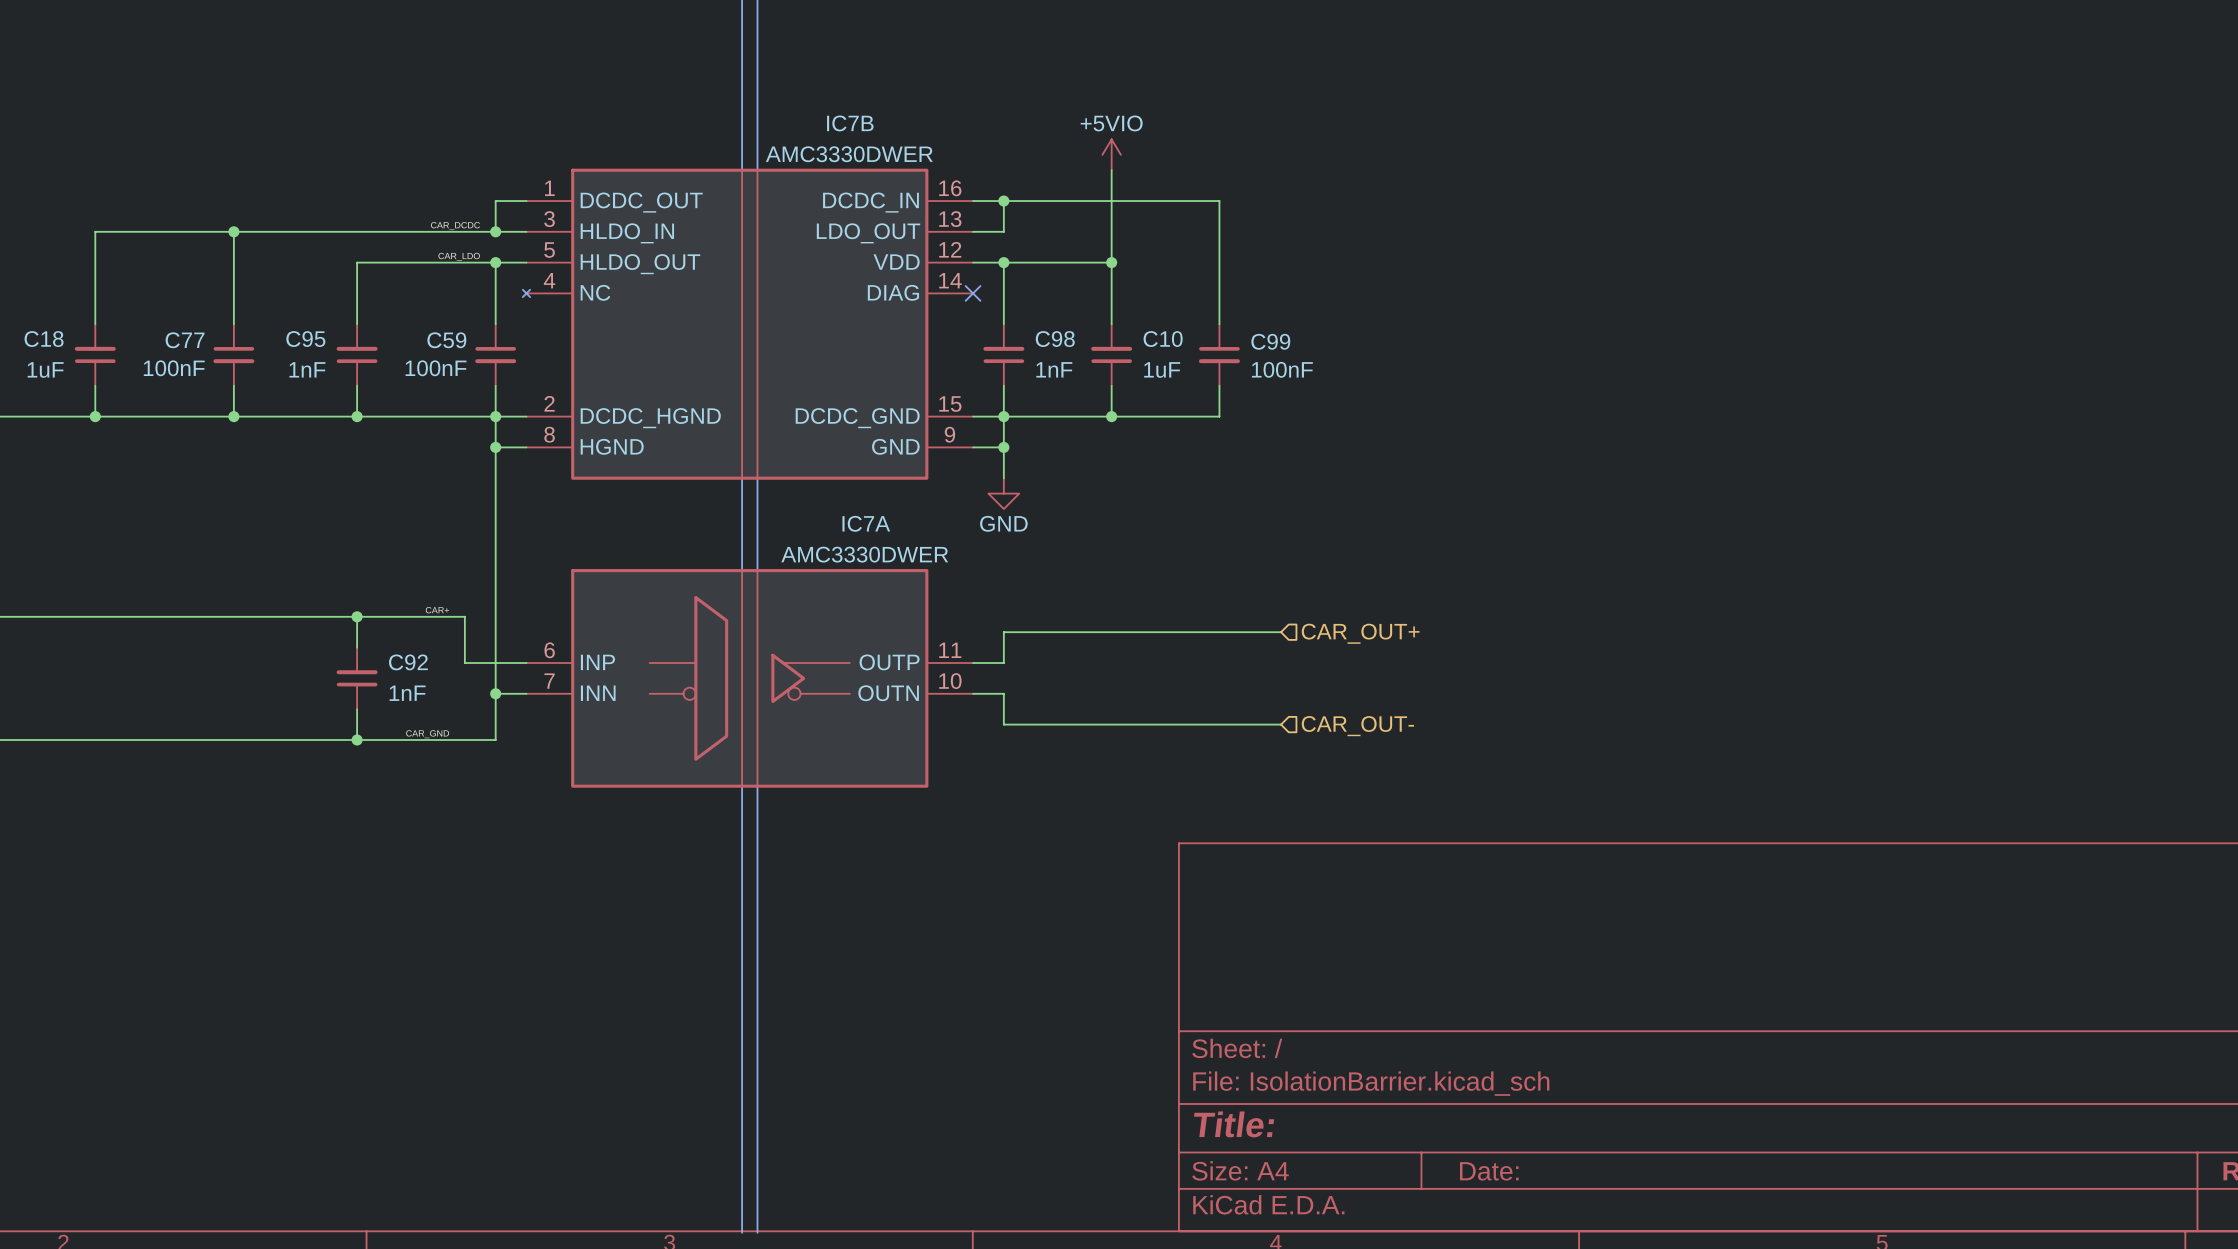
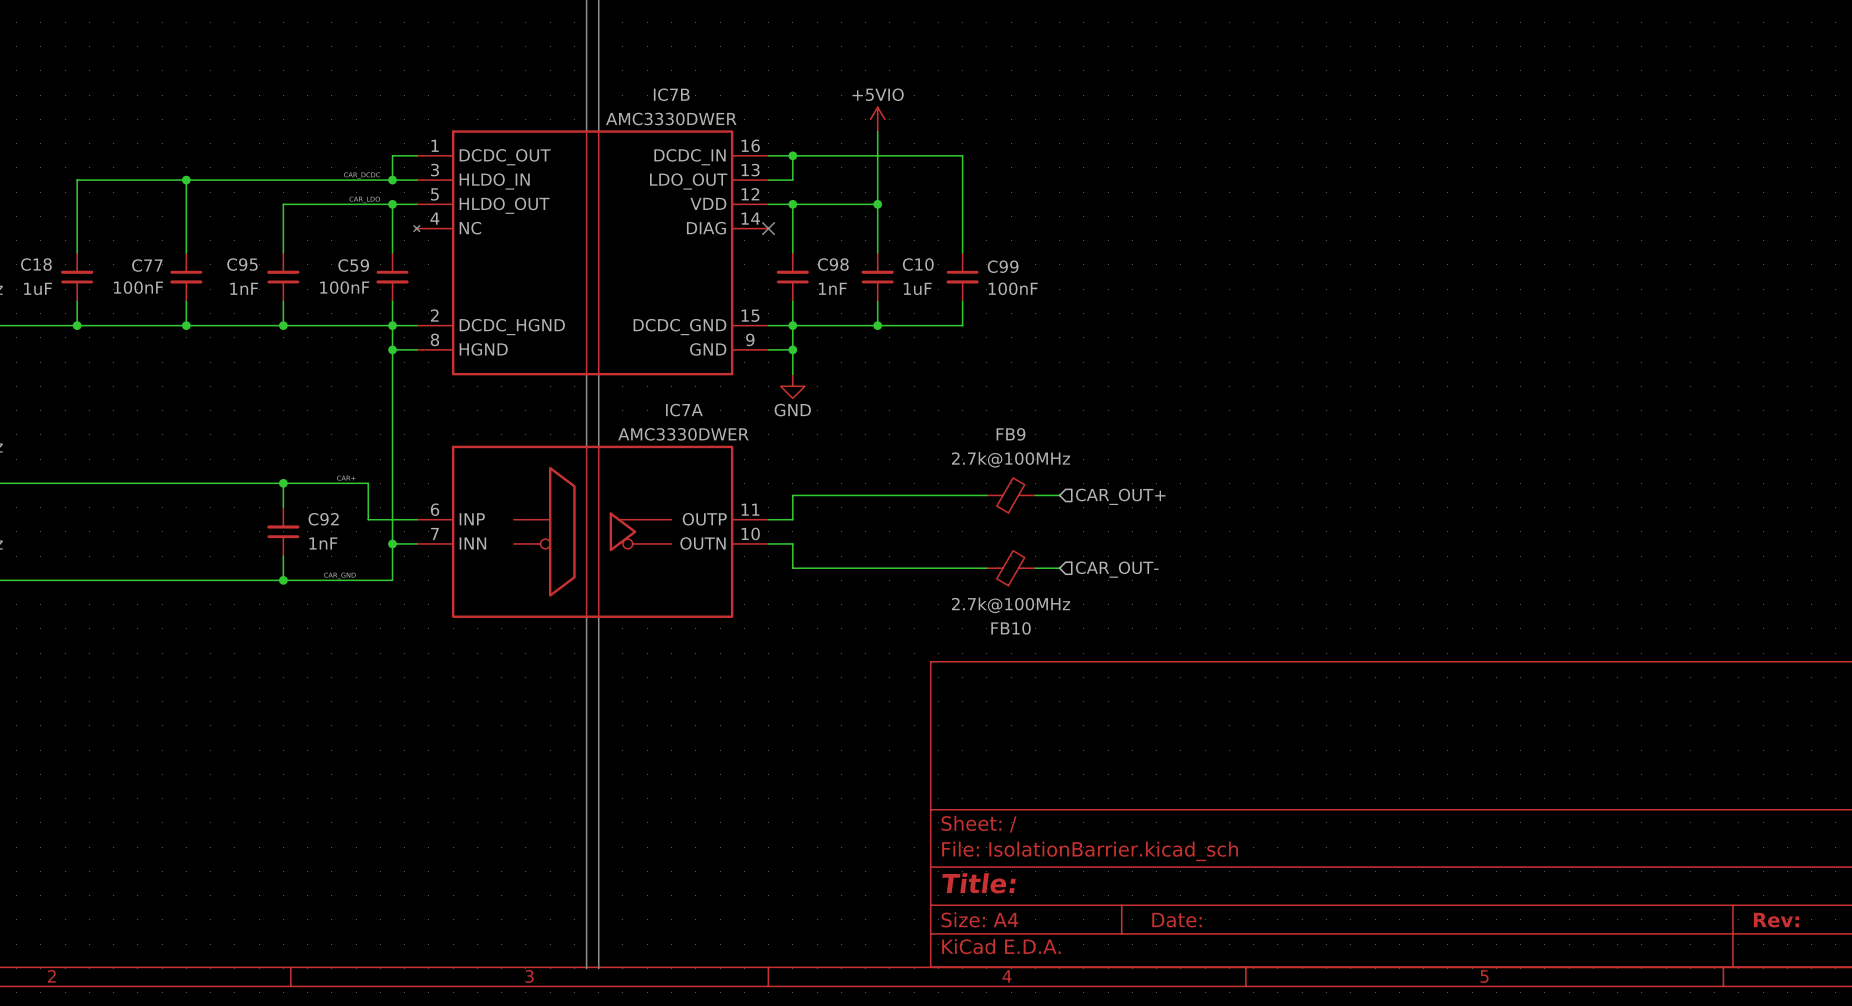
FB9: none -> 2.7k@100MHz (1011, 495)
hierarchical label position: CAR_OUT+ (1360, 633) -> CAR_OUT+ (1120, 496)
FB10: none -> 2.7k@100MHz (1011, 568)
hierarchical label position: CAR_OUT- (1357, 726) -> CAR_OUT- (1117, 569)

